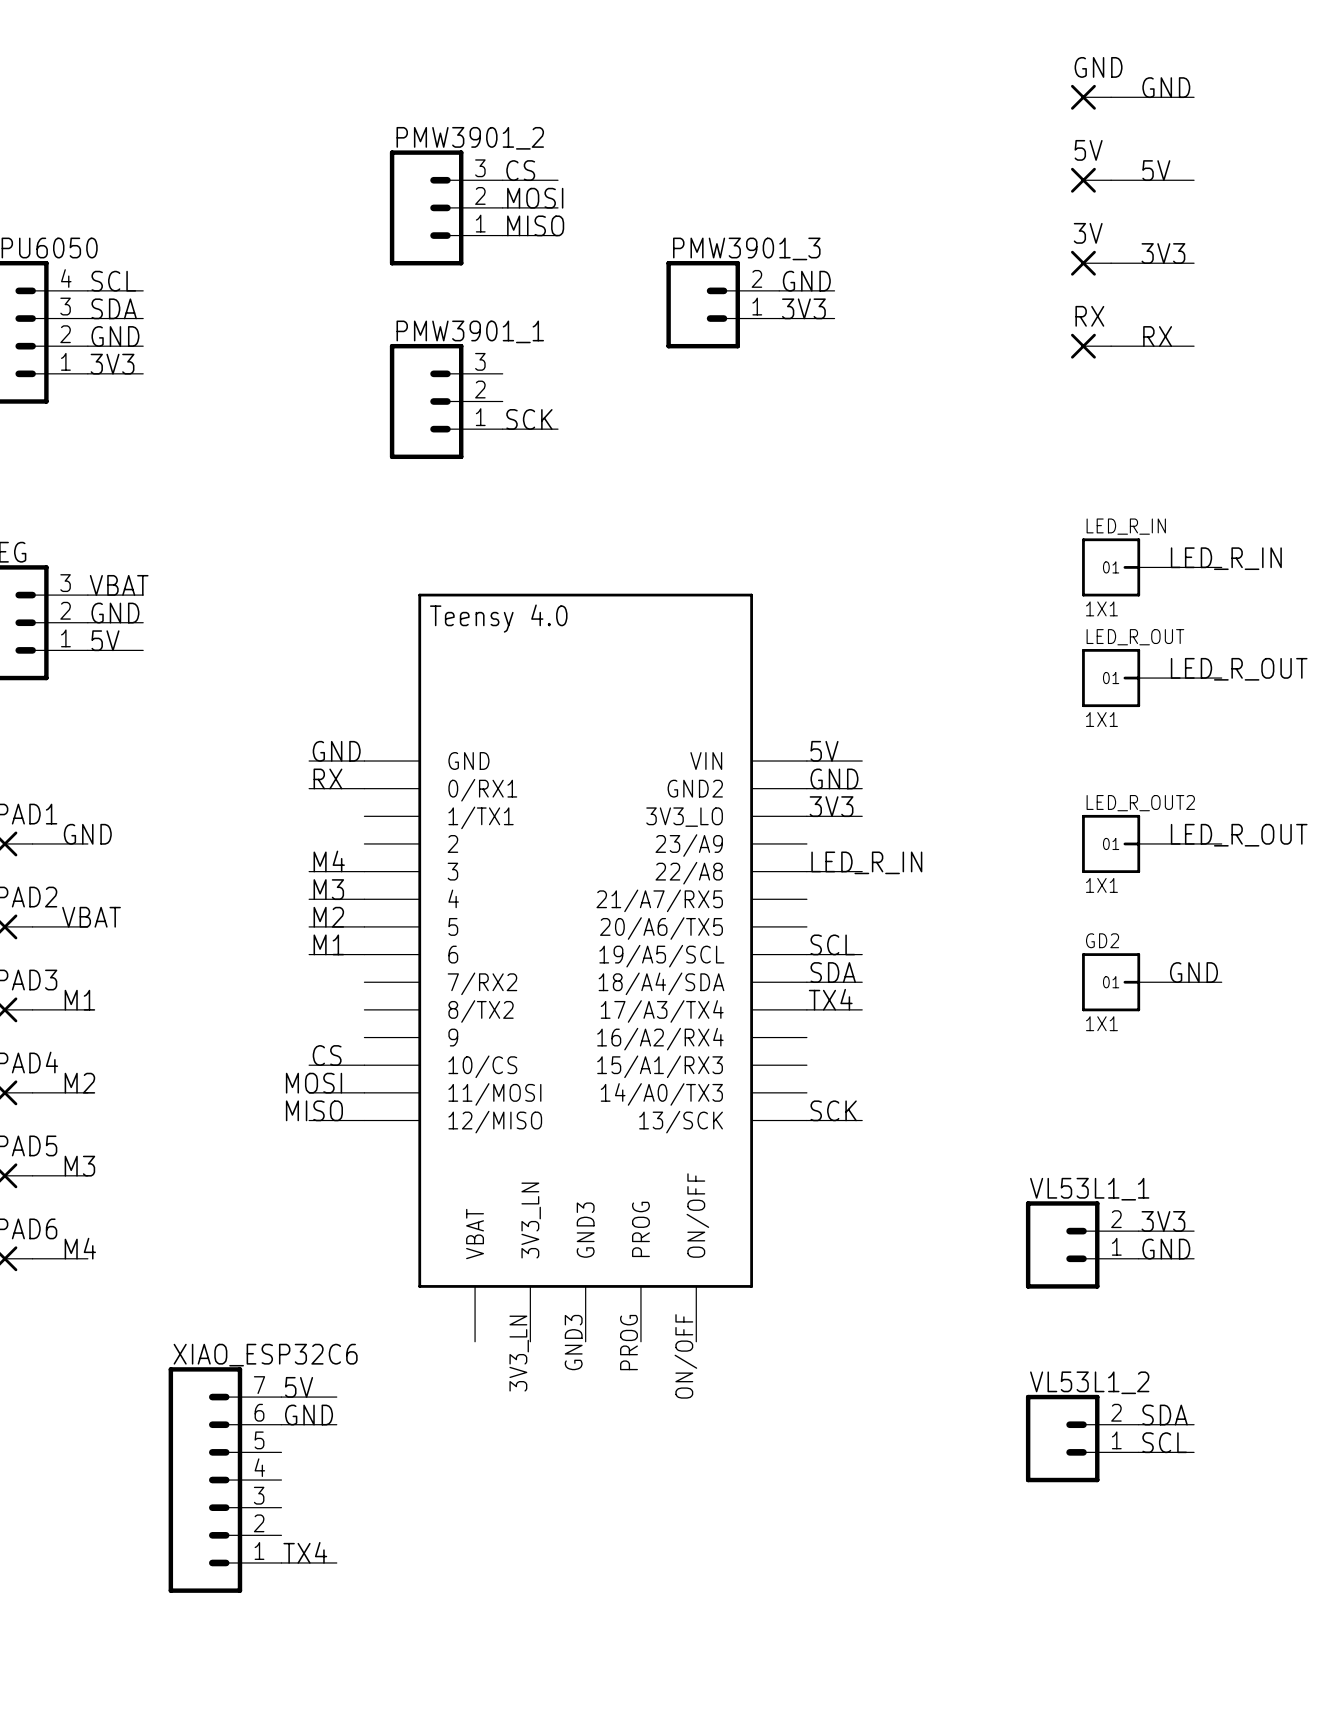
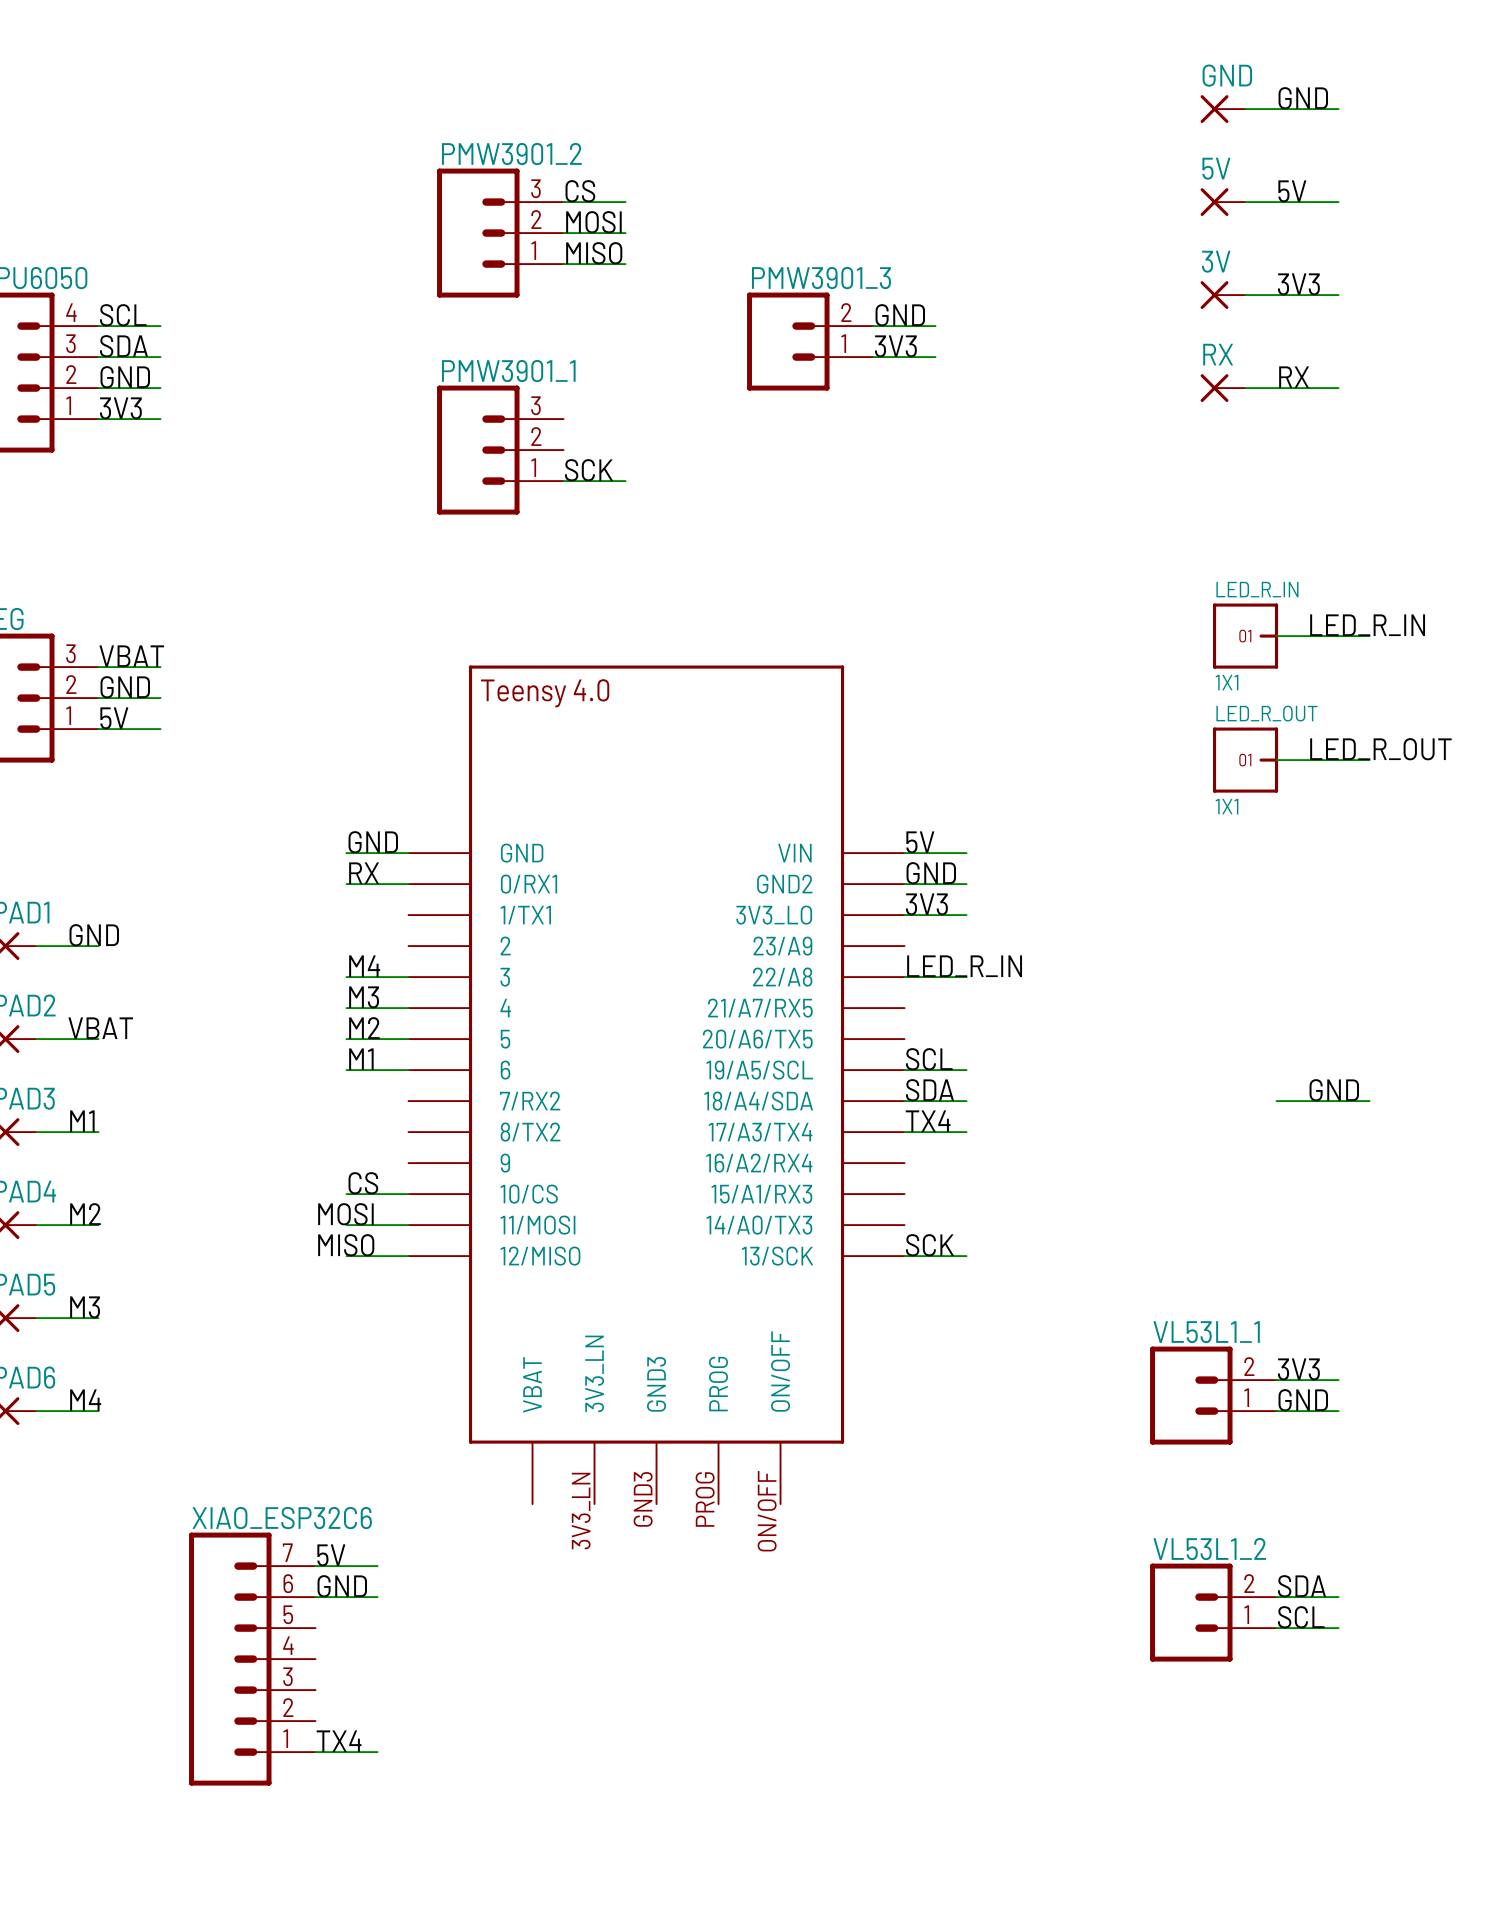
label: LED_R_OUT (1239, 835) -> none
LED_R_OUT2: 1X1 (1111, 843) -> none
wire: (1138, 843) (1221, 843) -> none
GD2: 1X1 (1111, 982) -> none

